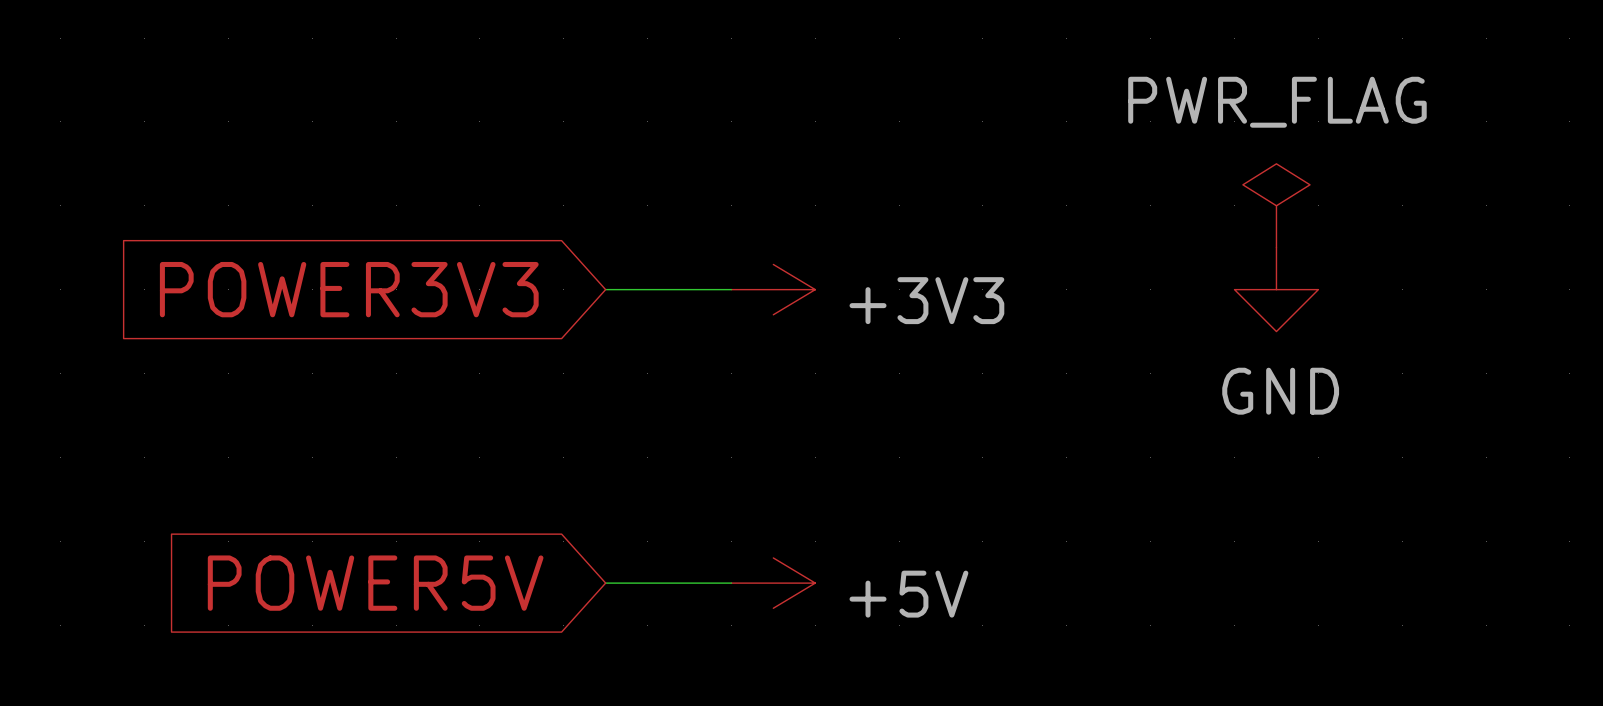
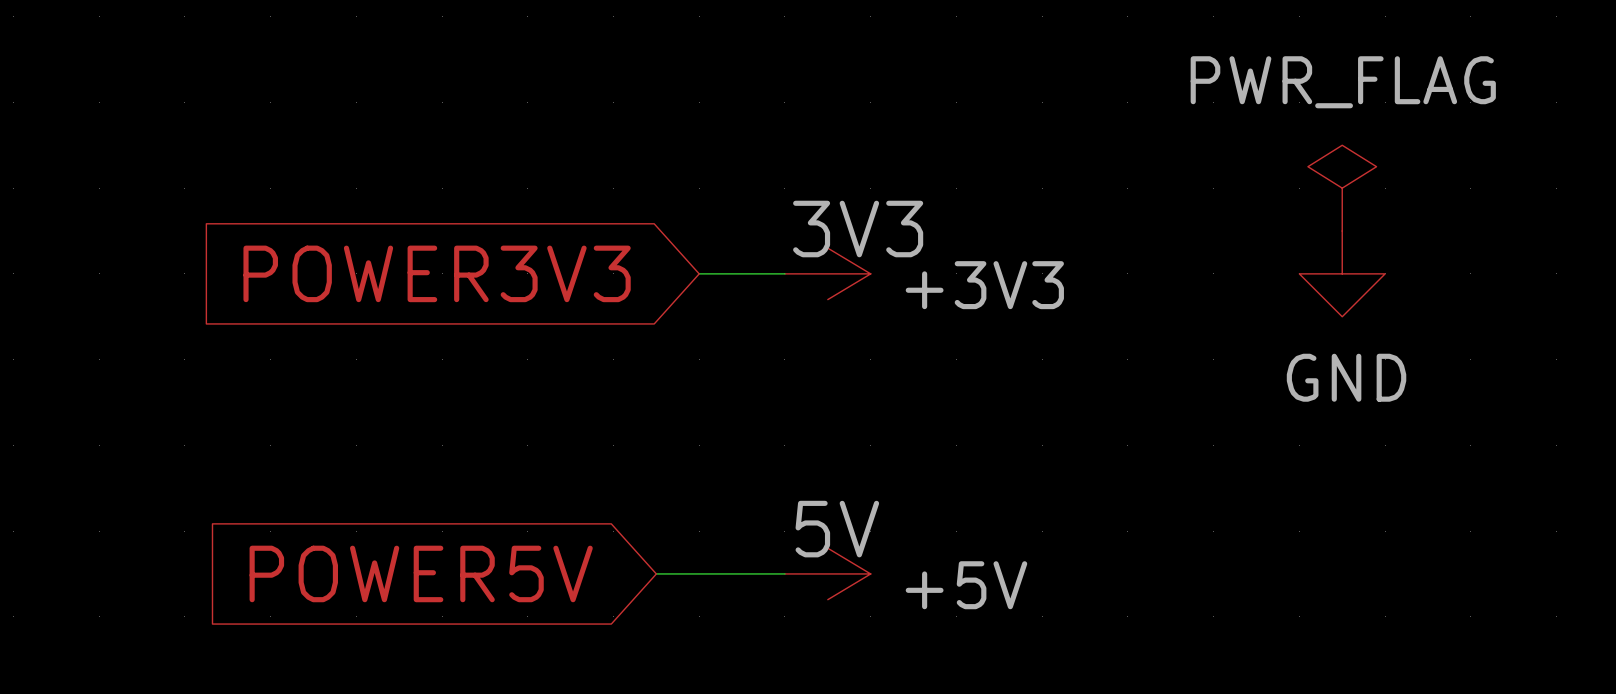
label: none -> 3V3 (858, 229)
global label position: POWER3V3 (349, 289) -> POWER3V3 (437, 273)
wire: (605, 289) (647, 289) -> none
label: none -> 5V (837, 529)

